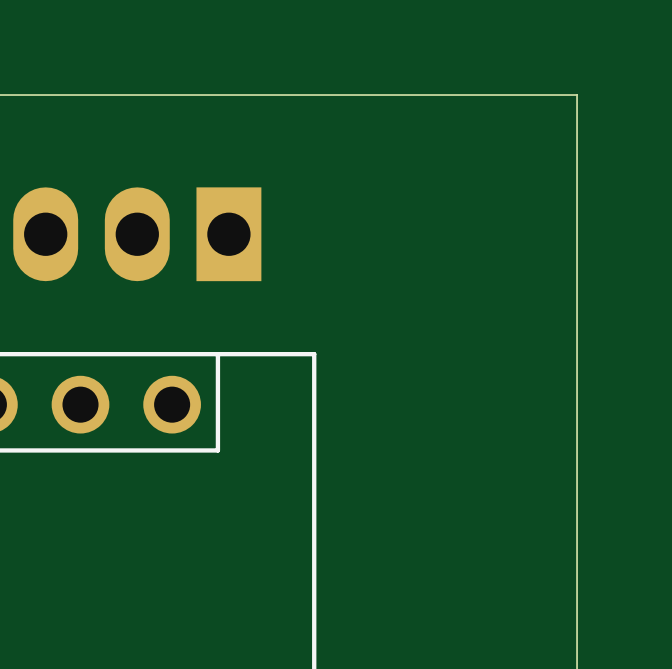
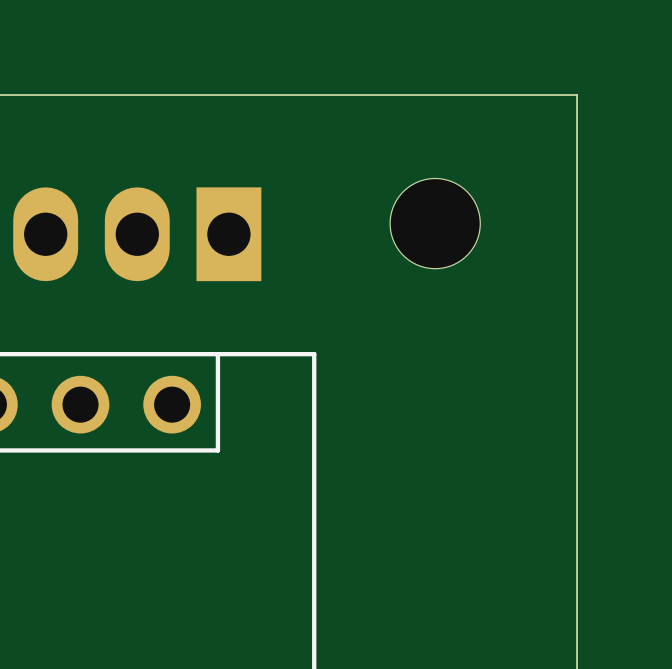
part: none -> (435, 223)

